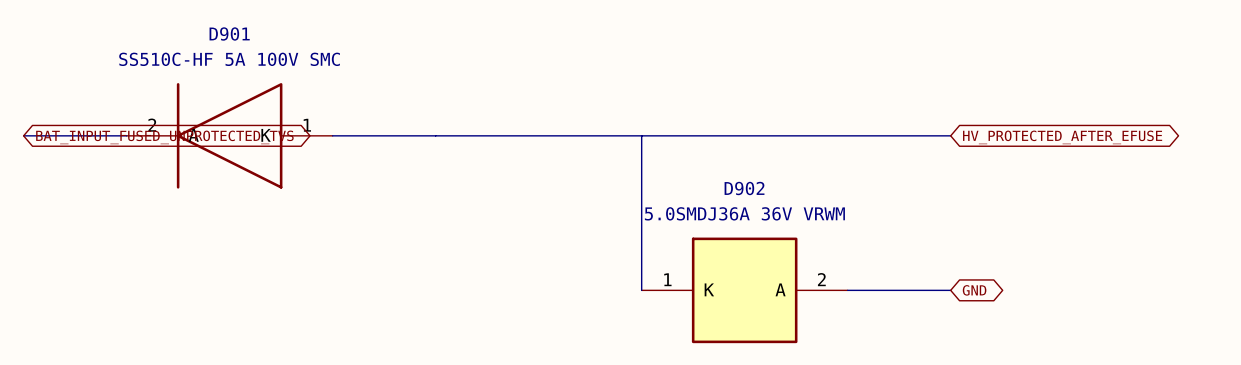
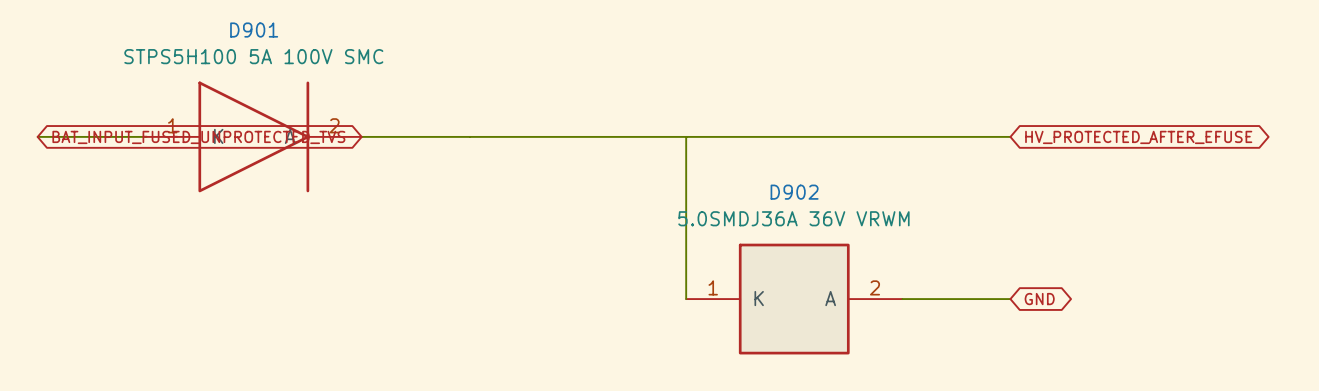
D901 value: SS510C-HF 5A 100V SMC (229, 59) -> STPS5H100 5A 100V SMC (253, 56)
D901 rotation: 0° (229, 135) -> 180° (253, 136)

